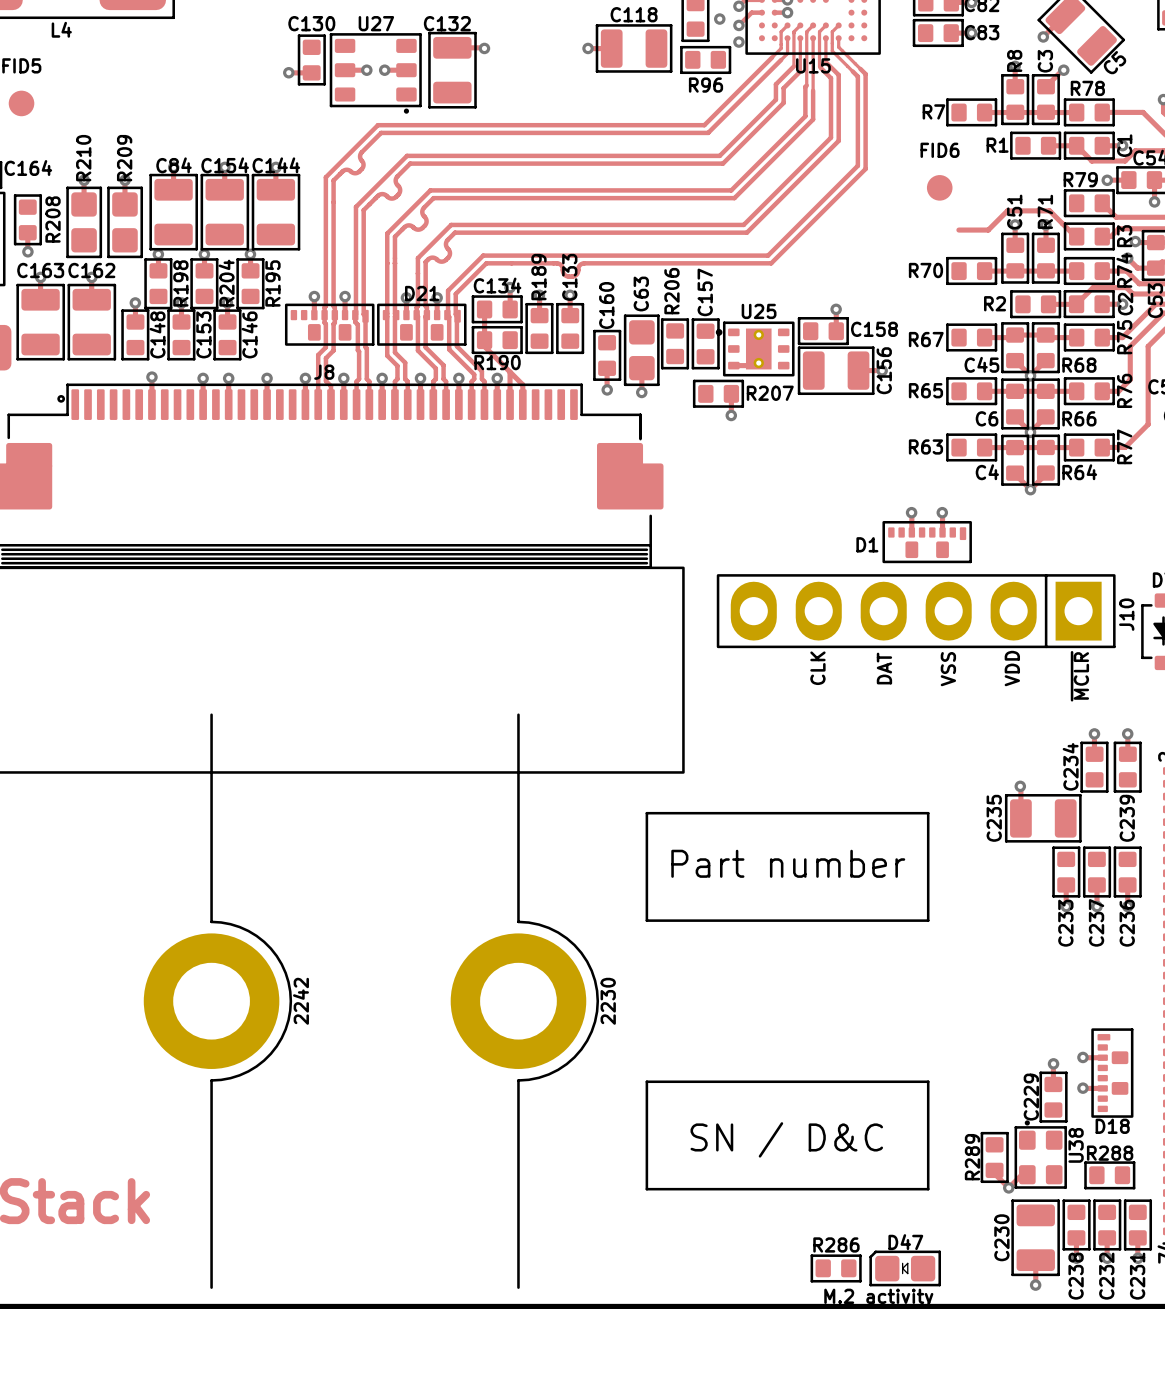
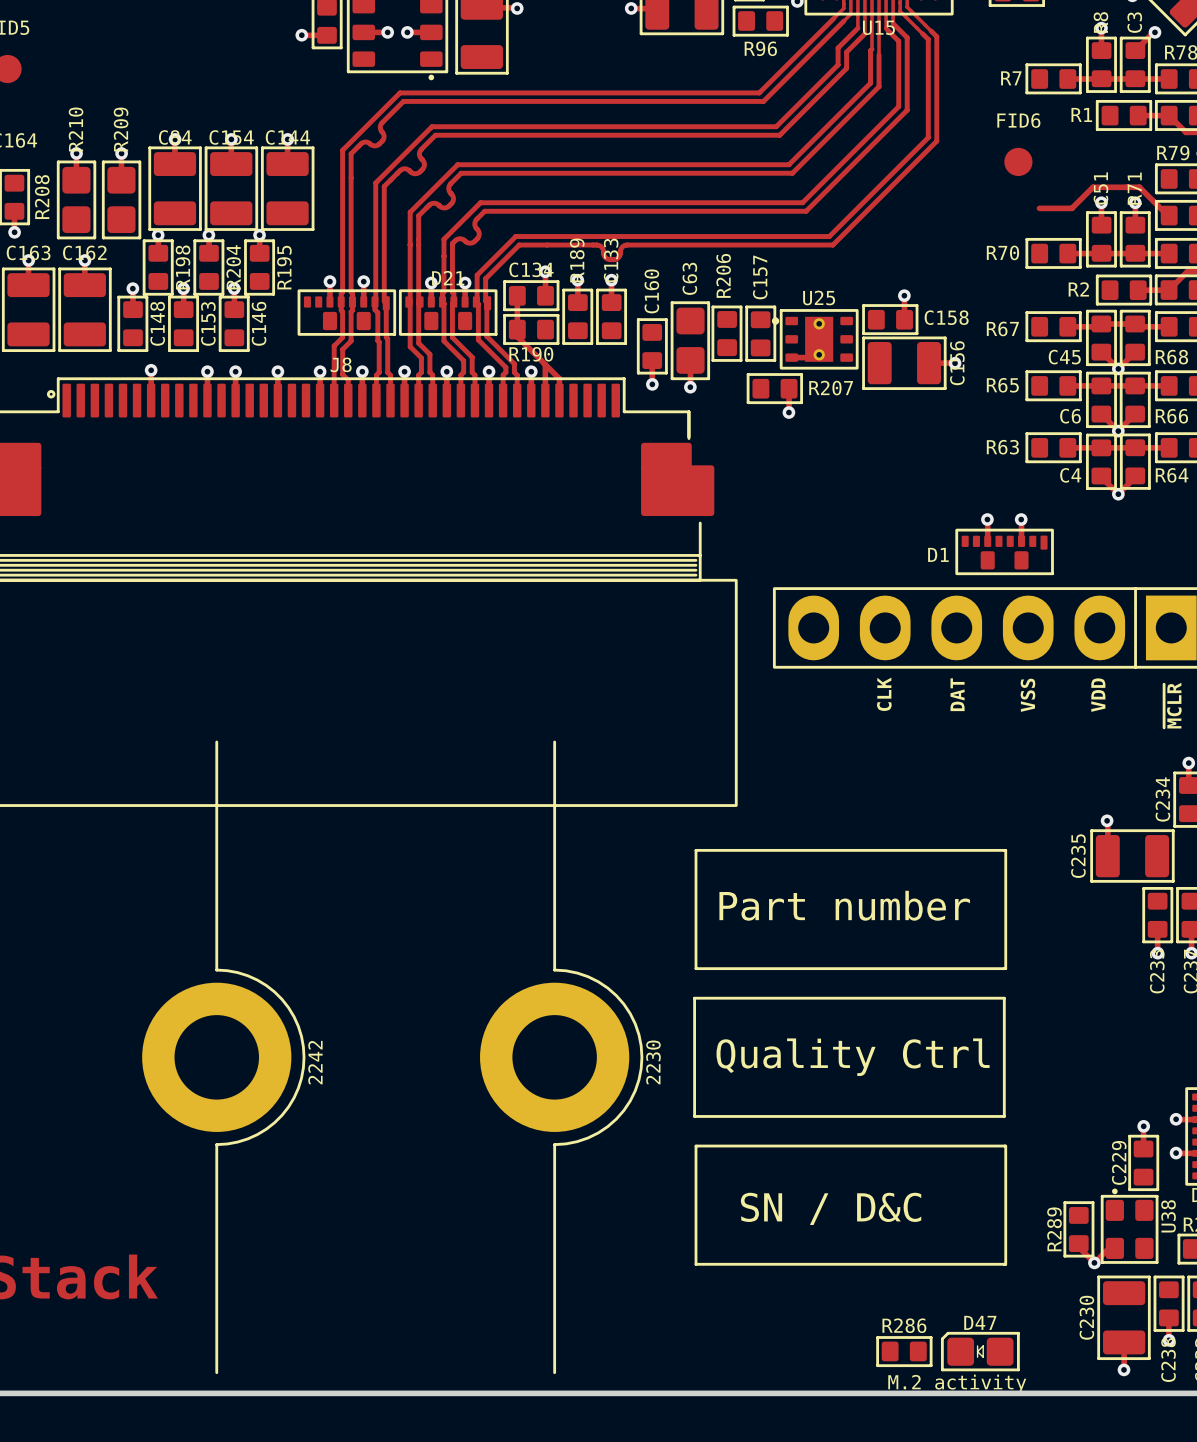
line: none -> (694, 998) (1004, 998) (1004, 1116) (694, 1116) (694, 998)
text: none -> Quality Ctrl (853, 1057)

